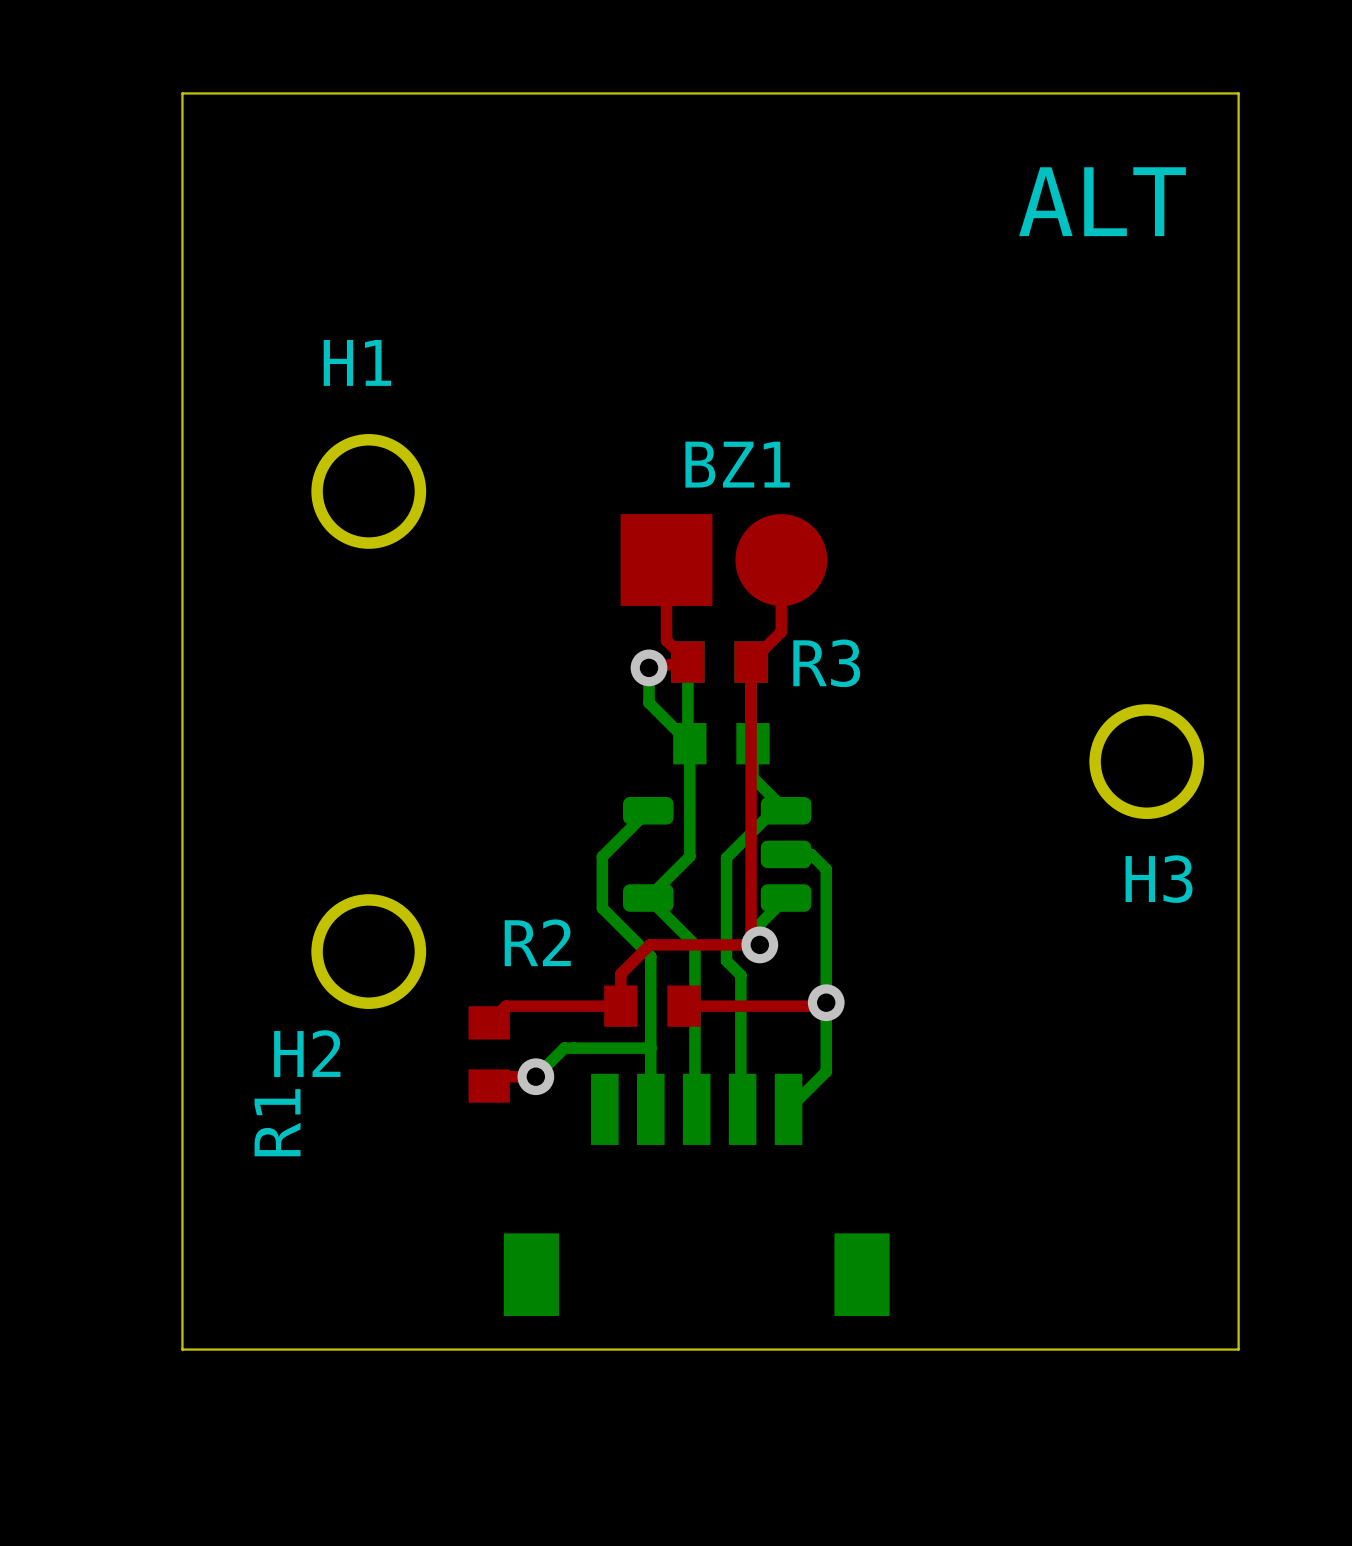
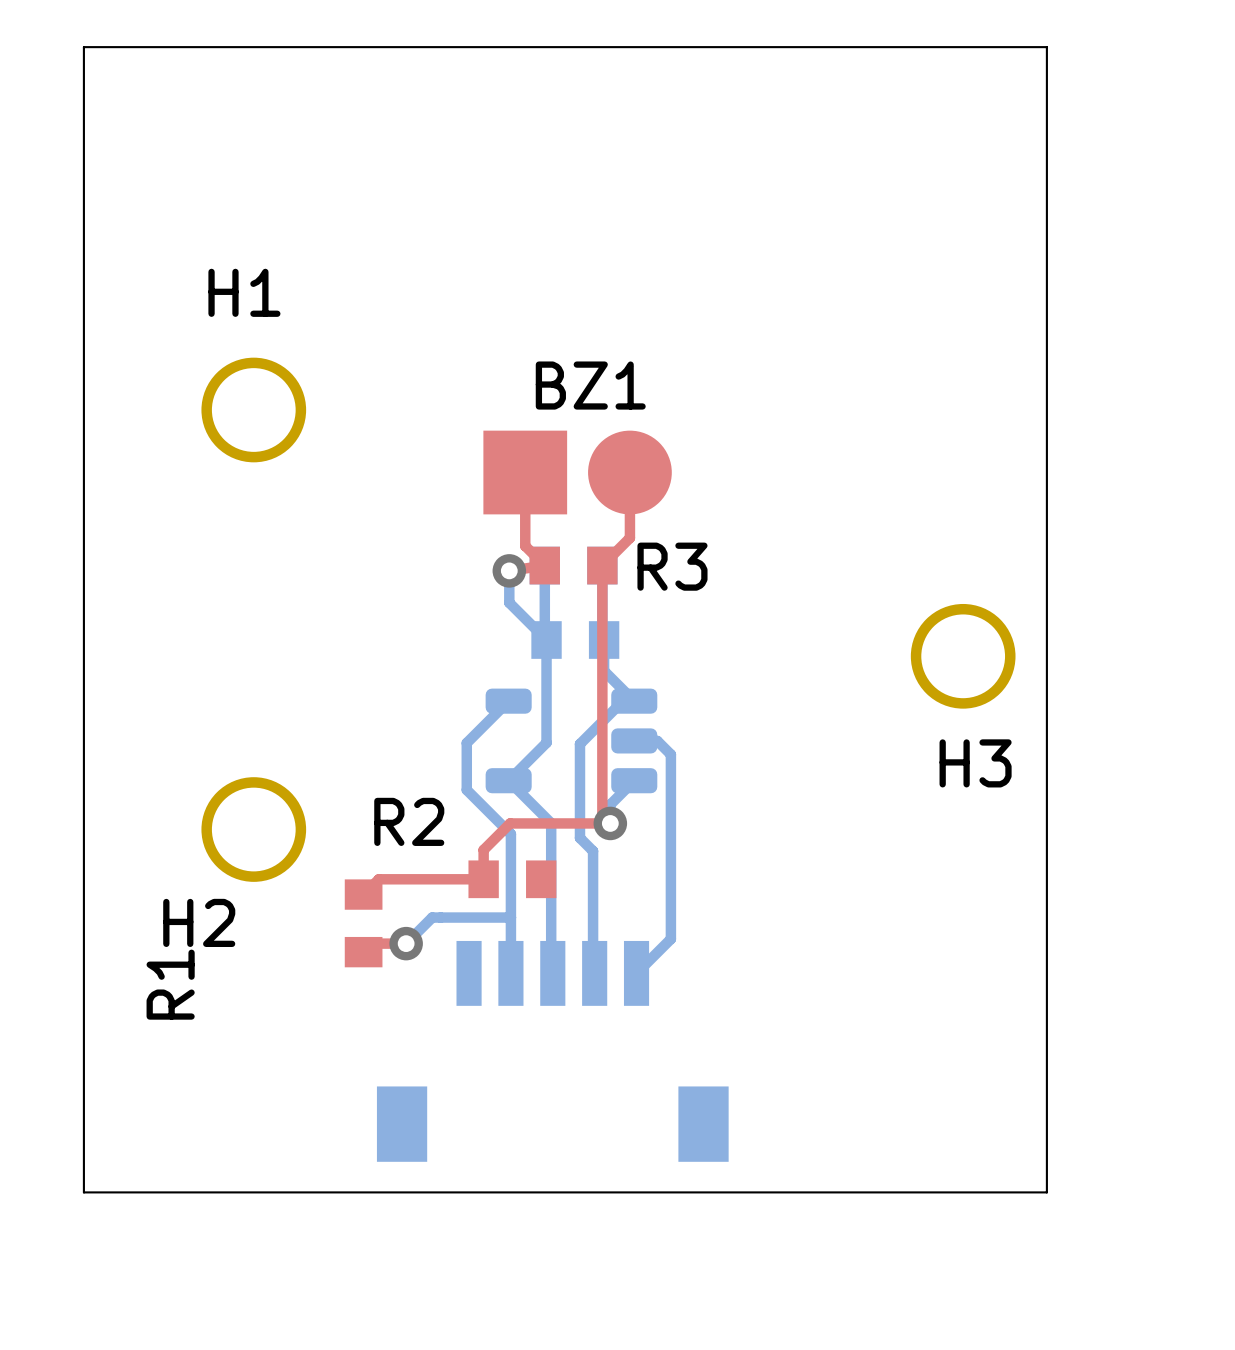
text: ALT (1102, 201) -> none
top track: (826, 1002) (822, 1006) (683, 1006) -> none
via: (826, 1002) -> none

